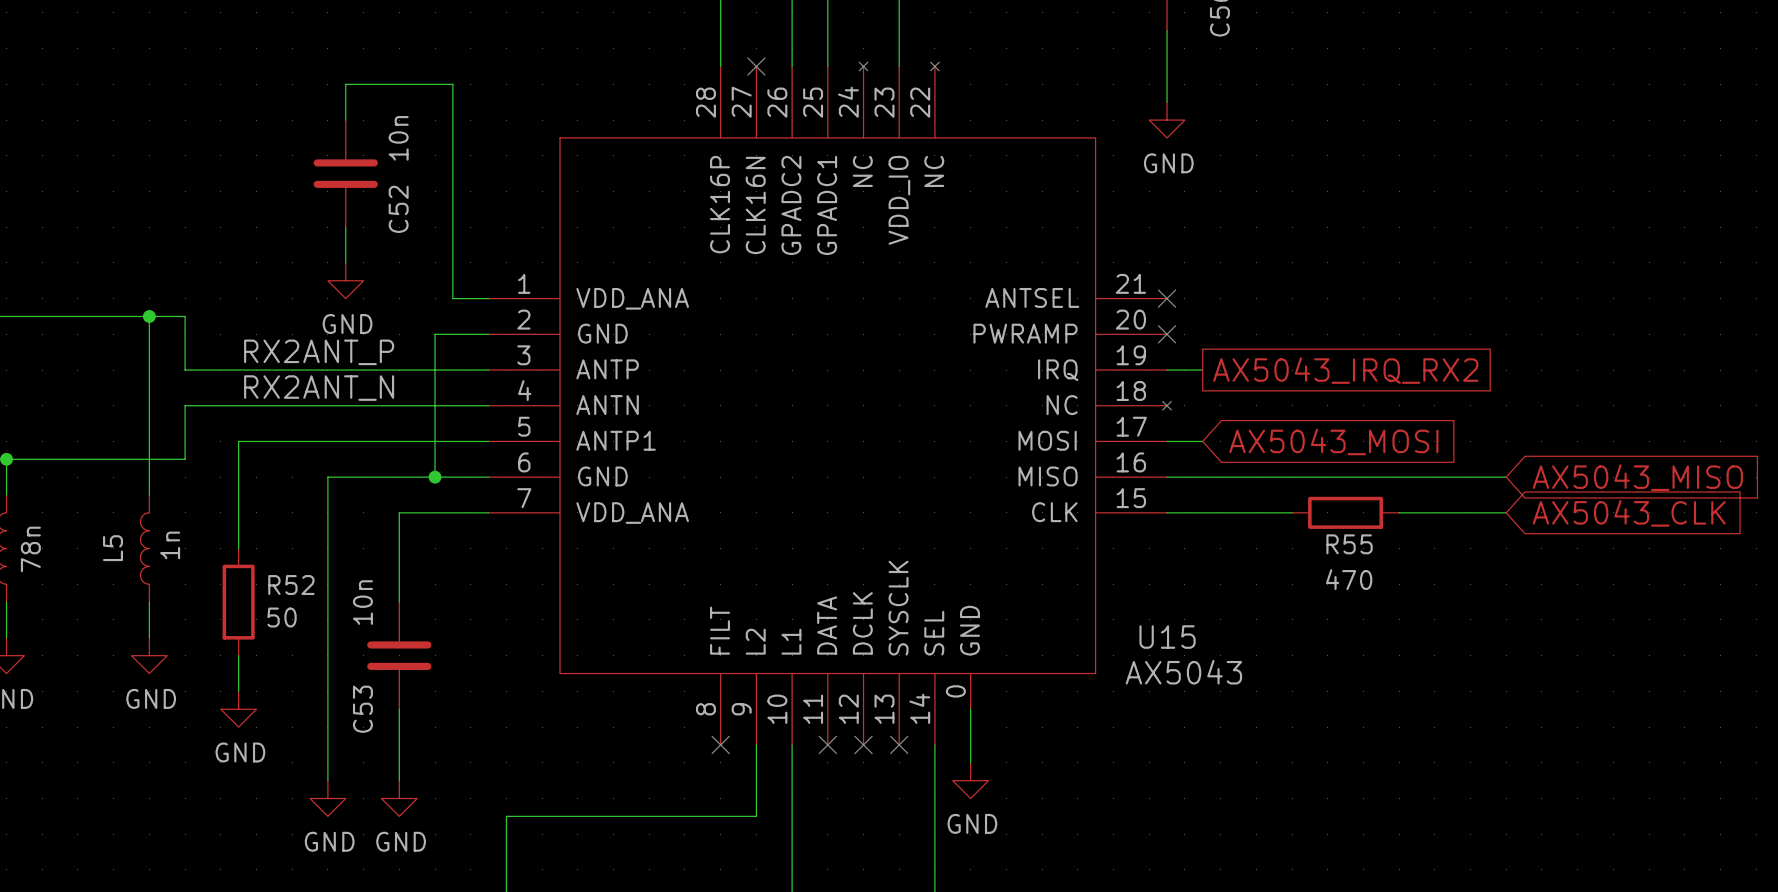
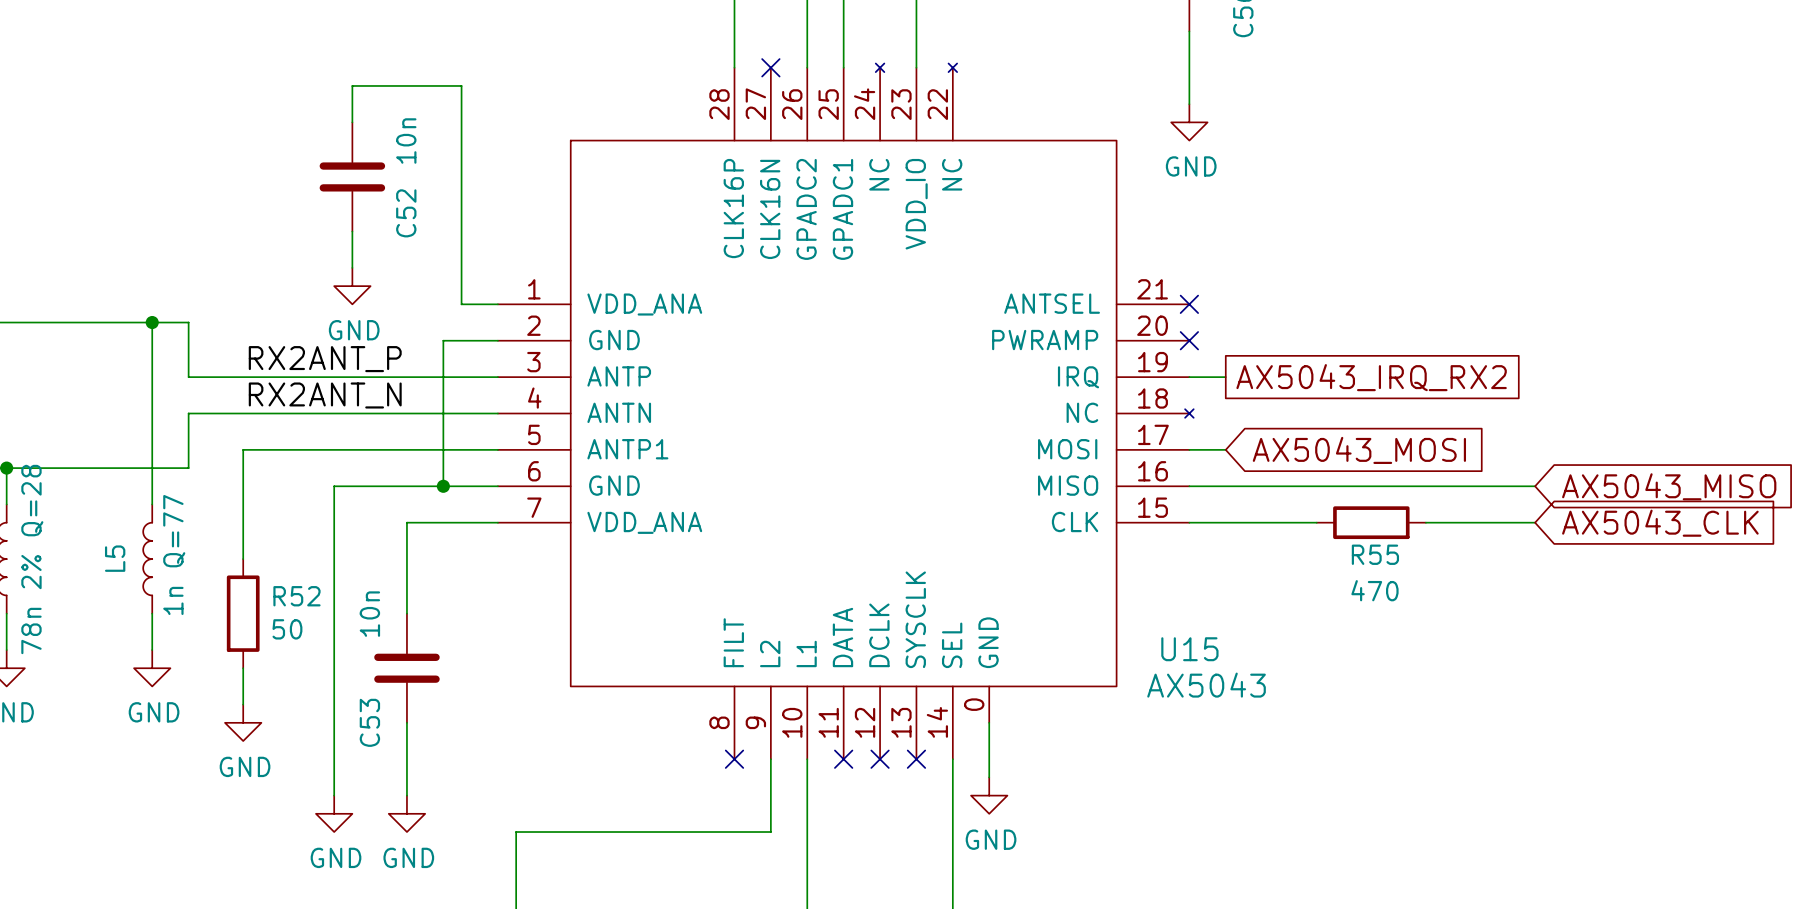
L5 value: 1n (170, 545) -> 1n Q=77 (174, 555)
part value: 78n (30, 549) -> 78n 2% Q=28 (32, 559)

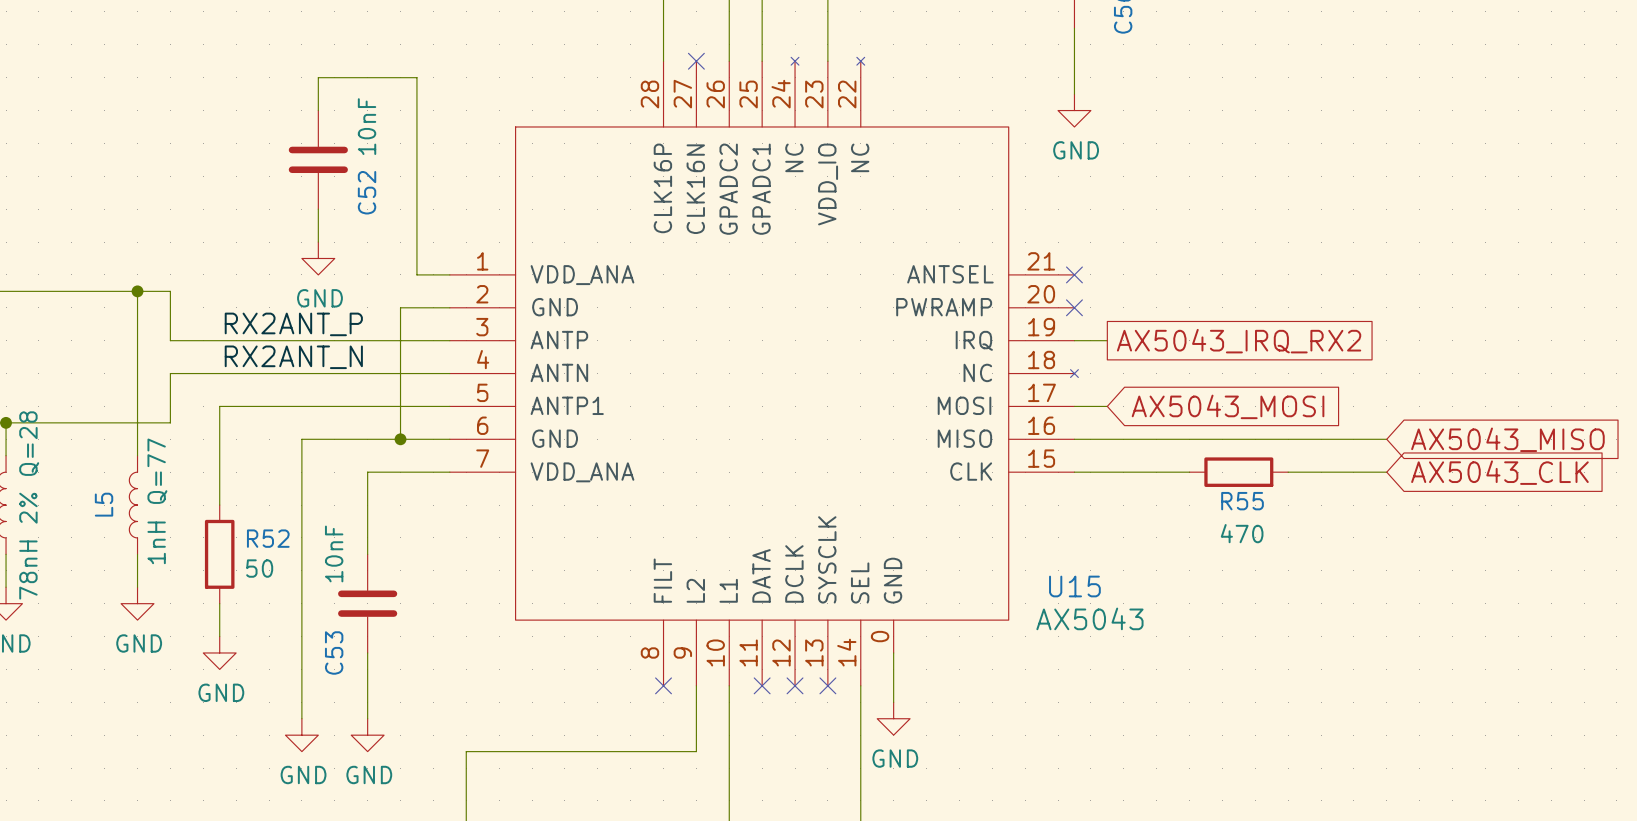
C52 value: 10n (406, 141) -> 10nF (367, 126)
L5 value: 1n Q=77 (174, 555) -> 1nH Q=77 (157, 501)
part value: 78n 2% Q=28 (32, 559) -> 78nH 2% Q=28 (29, 505)
C53 value: 10n (369, 614) -> 10nF (334, 553)

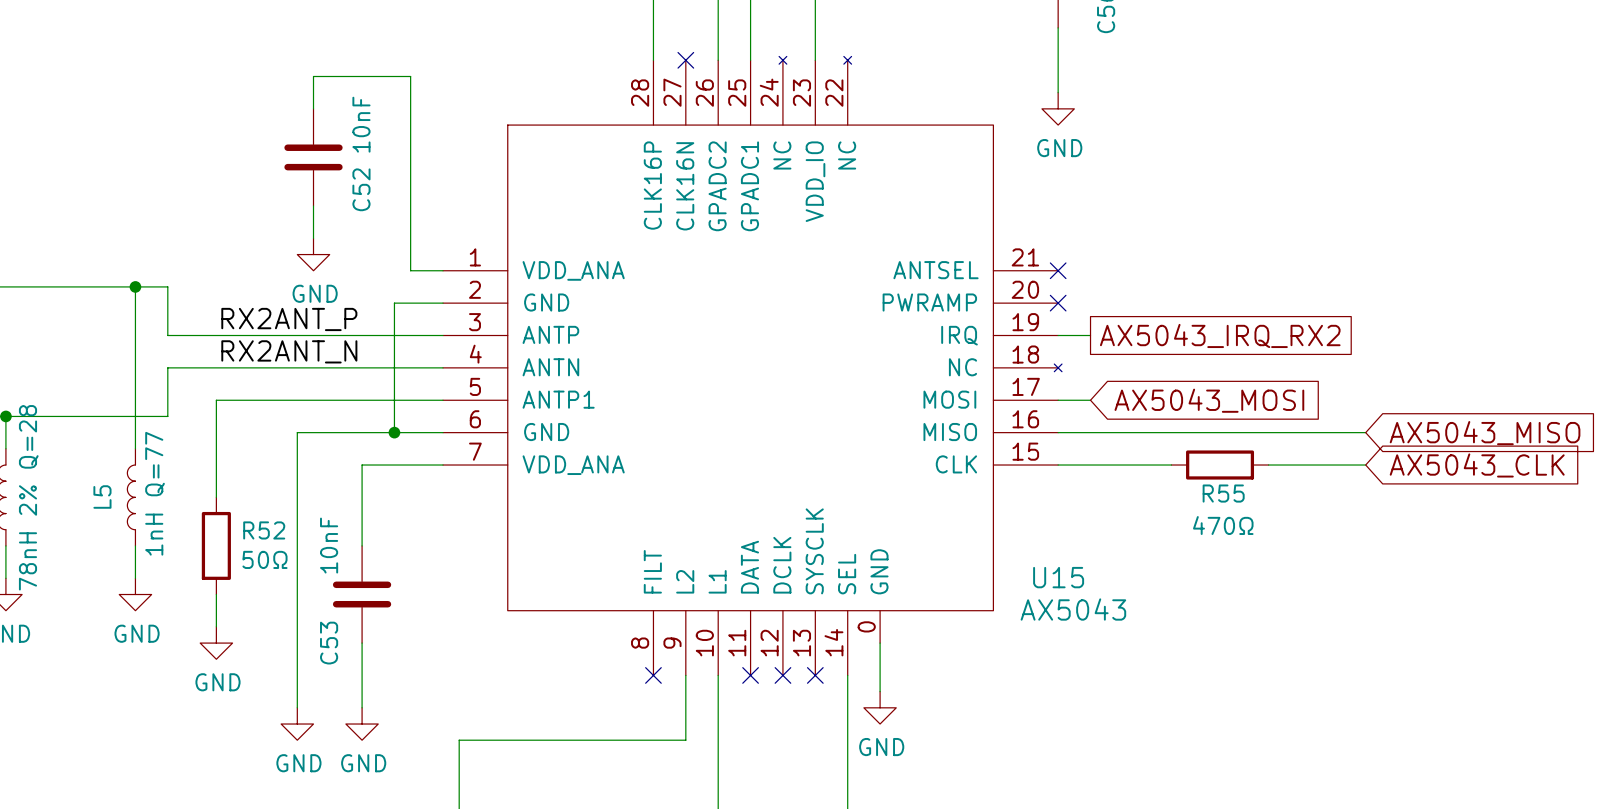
R55 value: 470 (1242, 533) -> 470Ω (1223, 525)
R52 value: 50 (259, 568) -> 50Ω (264, 559)

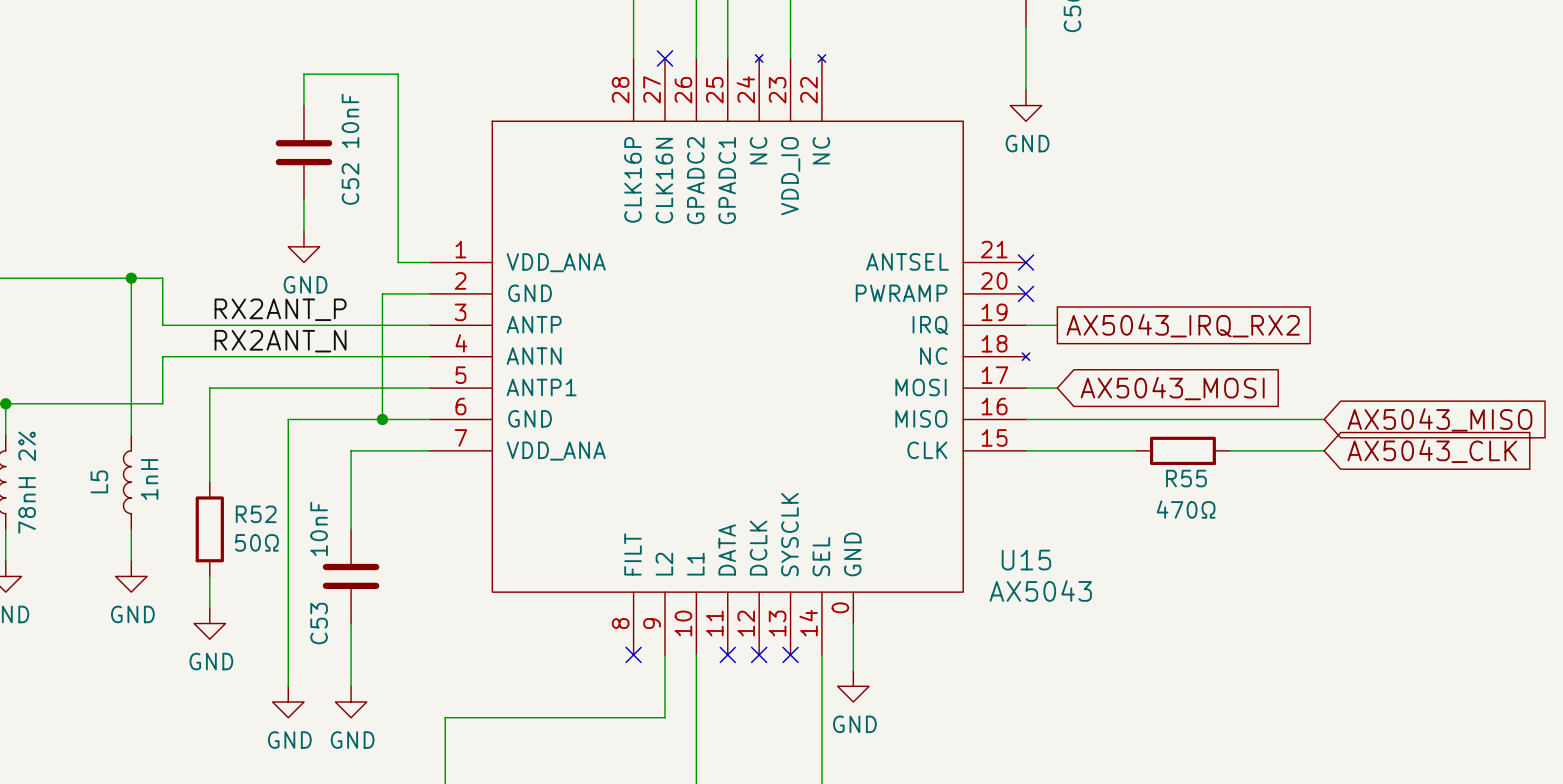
L5 value: 1nH Q=77 (155, 493) -> 1nH (149, 479)
part value: 78nH 2% Q=28 (28, 497) -> 78nH 2% (27, 482)

